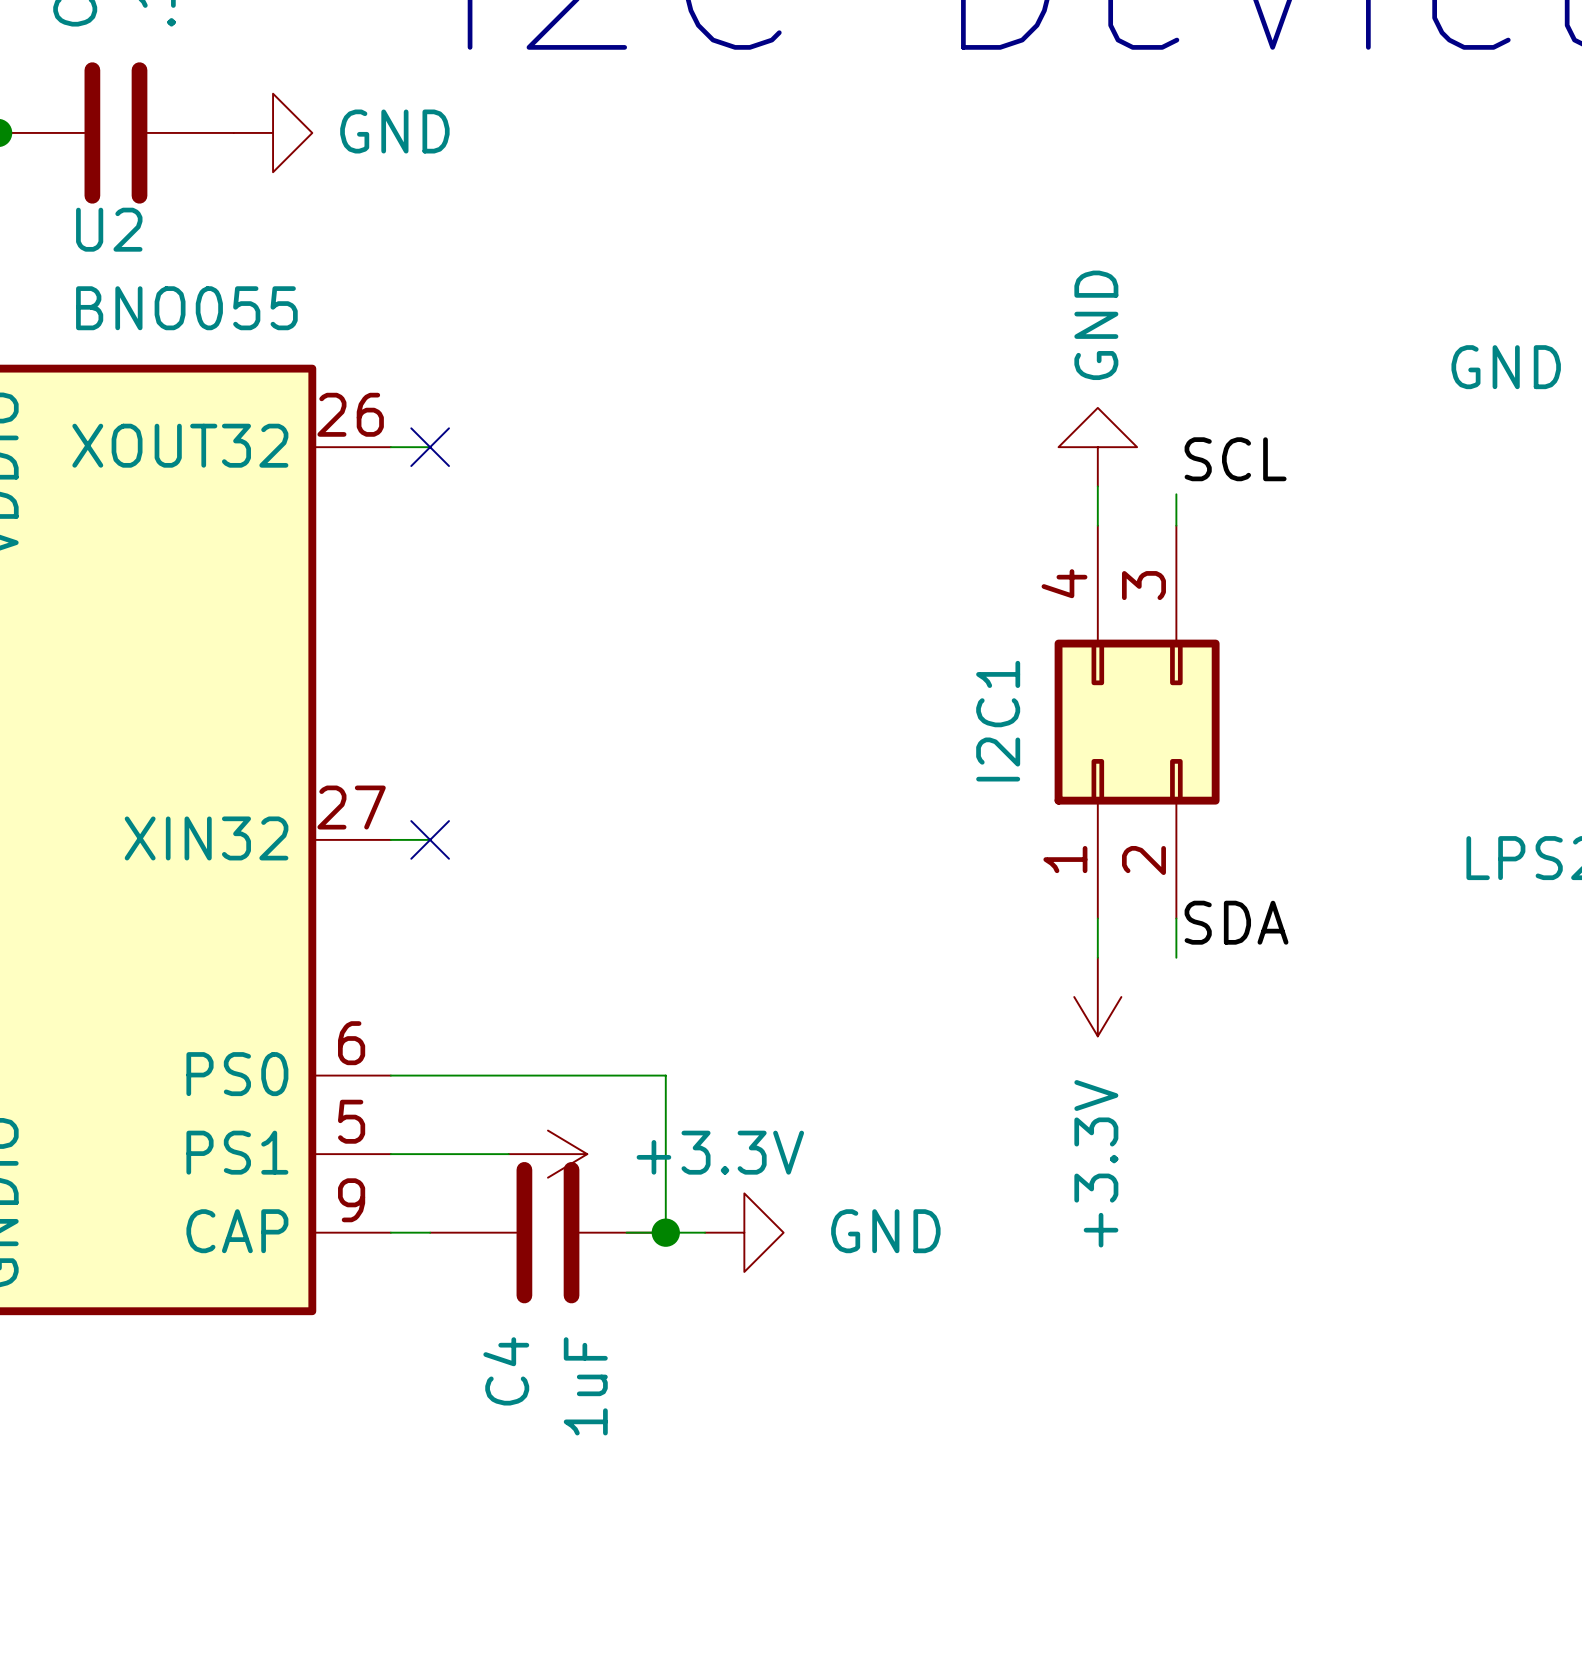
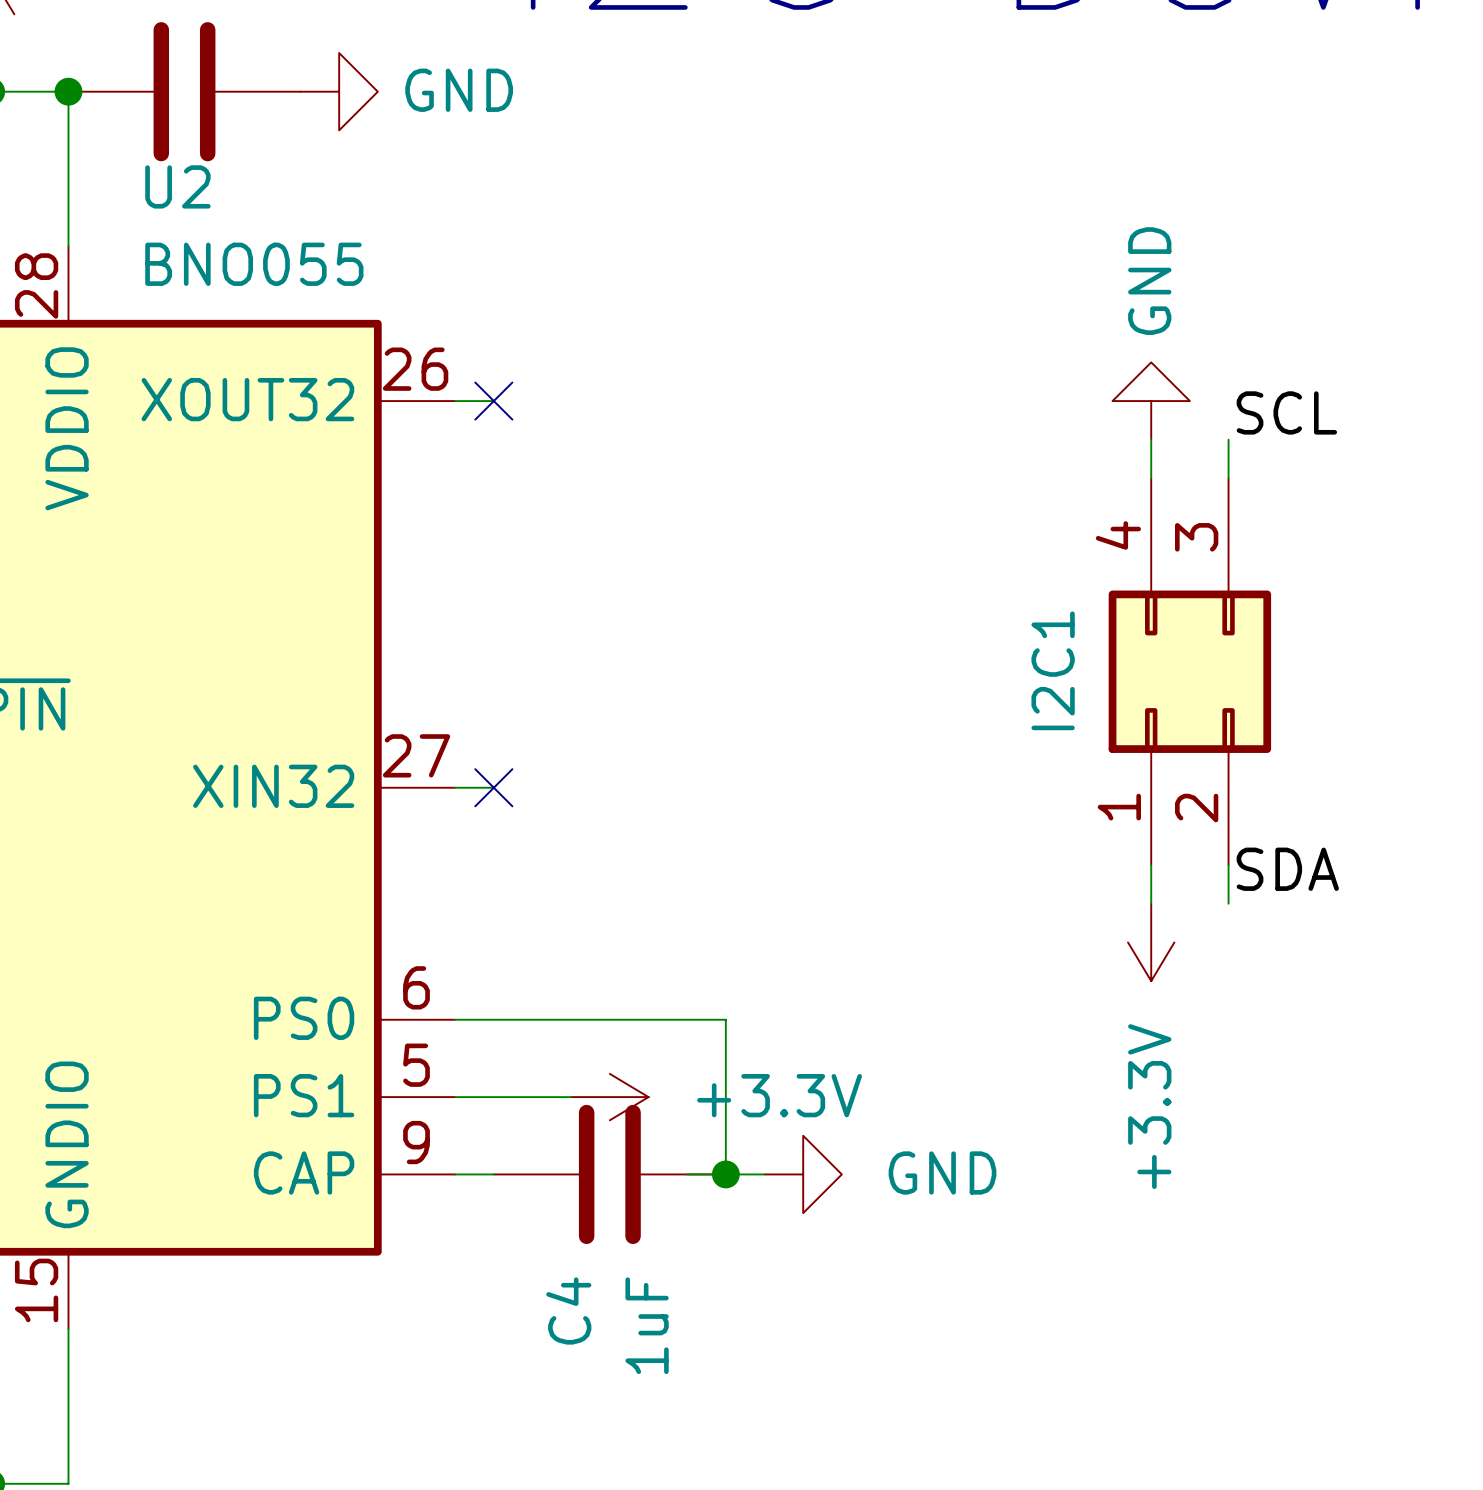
wire: none -> (1228, 439) (1228, 447)

